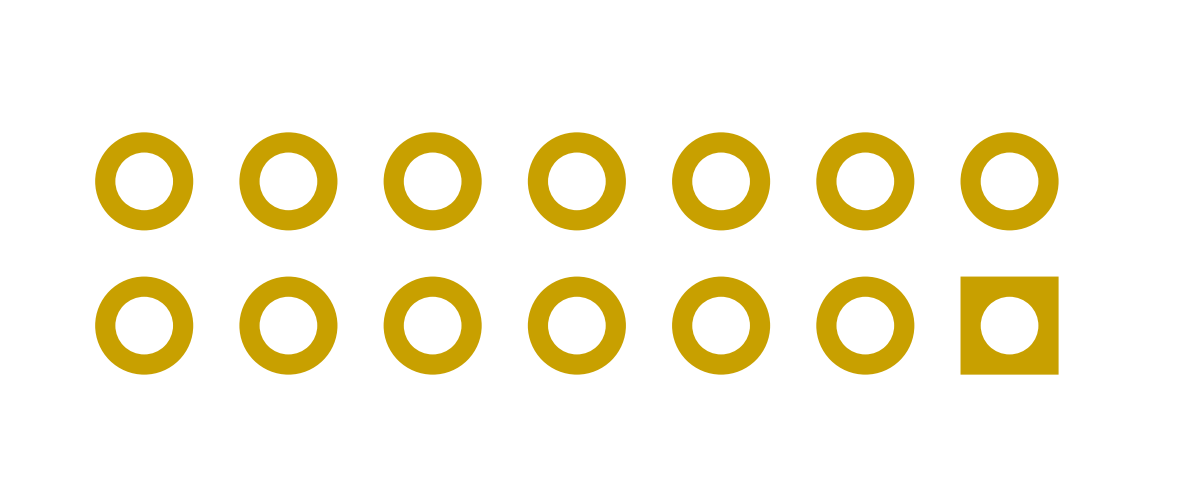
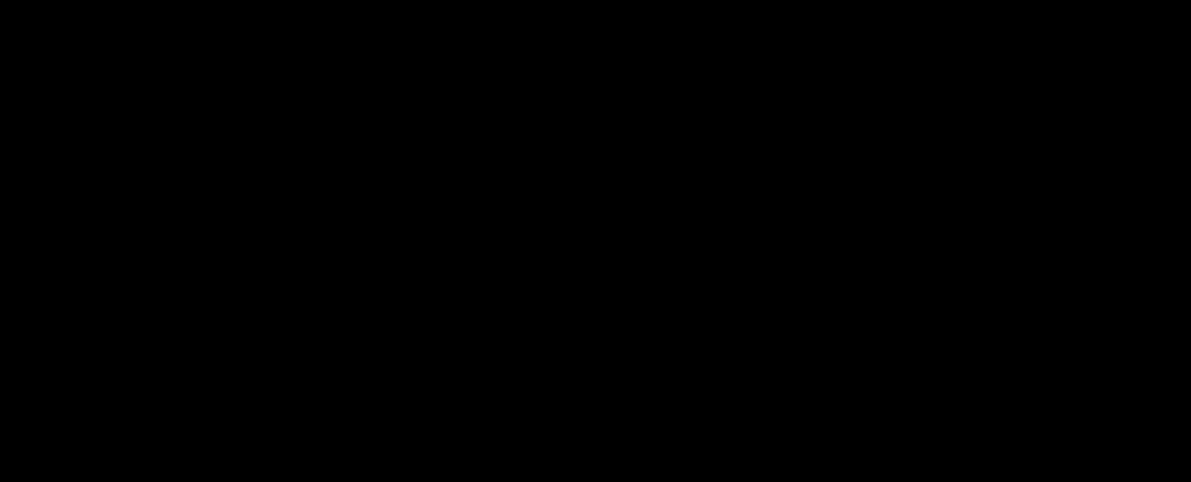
part: (576, 253) -> none

